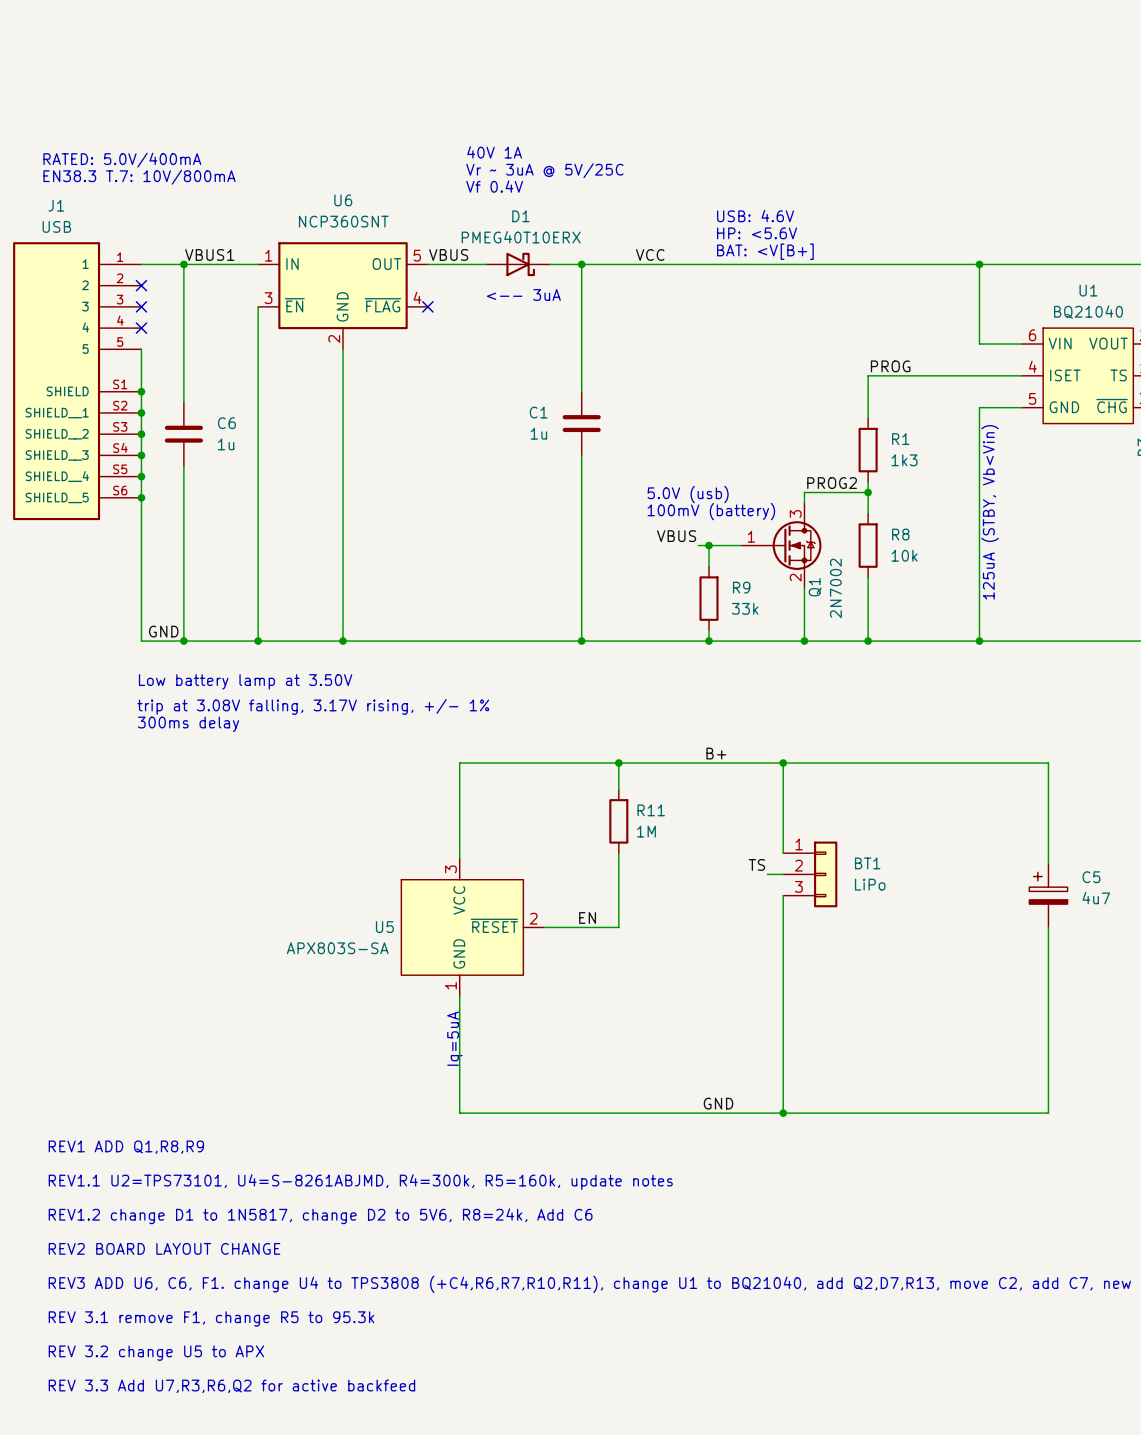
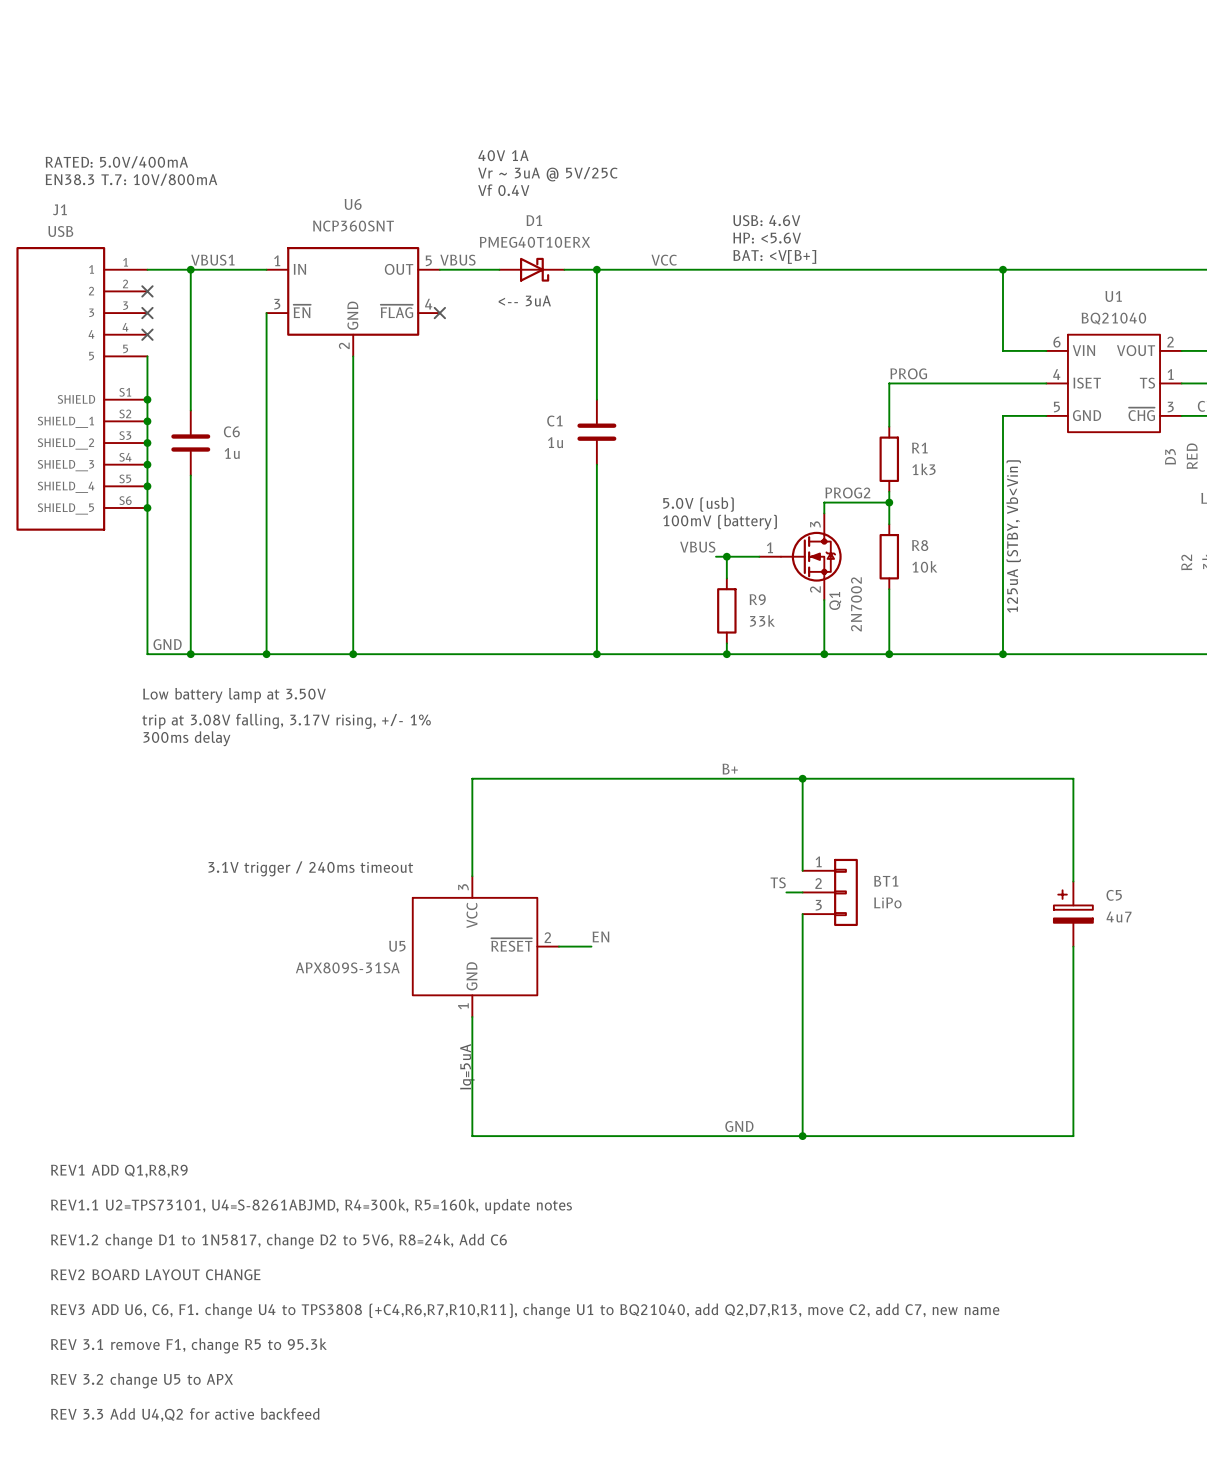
wire: (618, 763) (618, 789) -> none
junction: (618, 763) -> none
R11: 1M (618, 821) -> none
text: none -> 3.1V trigger / 240ms timeout (310, 868)
wire: (618, 853) (618, 927) (576, 927) -> none
U5 value: APX803S-SA (337, 948) -> APX809S-31SA (347, 967)
text: REV 3.3 Add U7,R3,R6,Q2 for active backfeed (231, 1386) -> REV 3.3 Add U4,Q2 for active backfeed (185, 1414)

